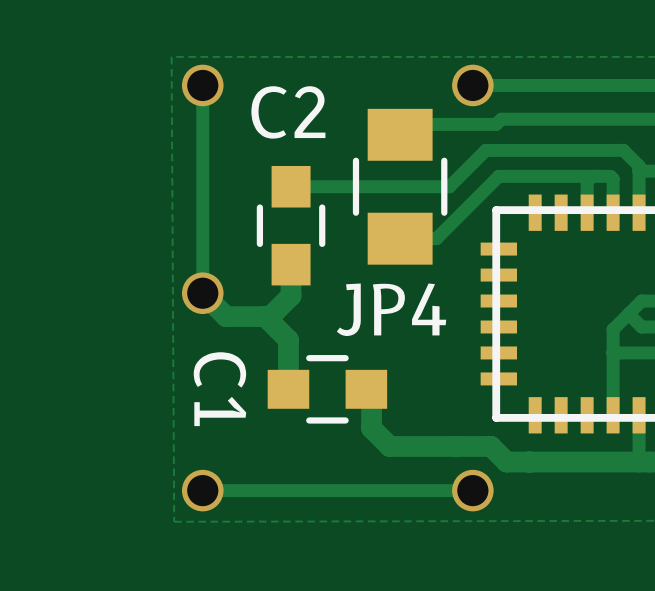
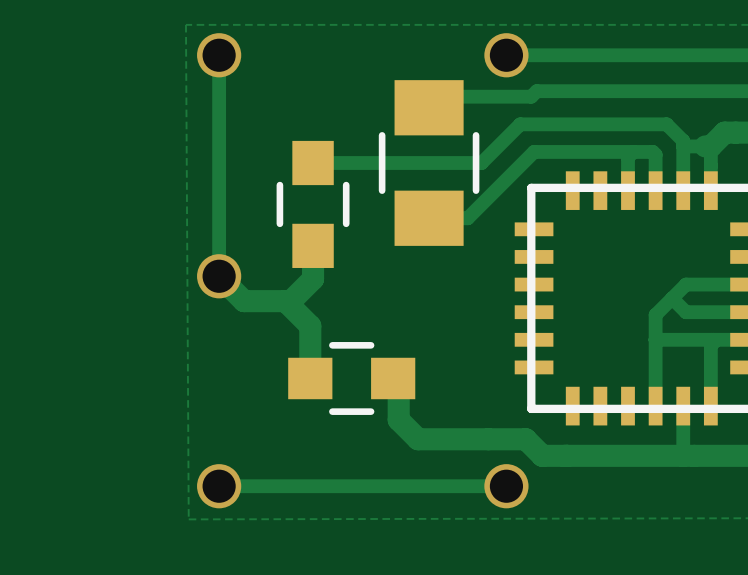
C2 name: C2 (288, 112) -> none
JP4 name: JP4 (391, 309) -> none
C1 name: C1 (220, 389) -> none

